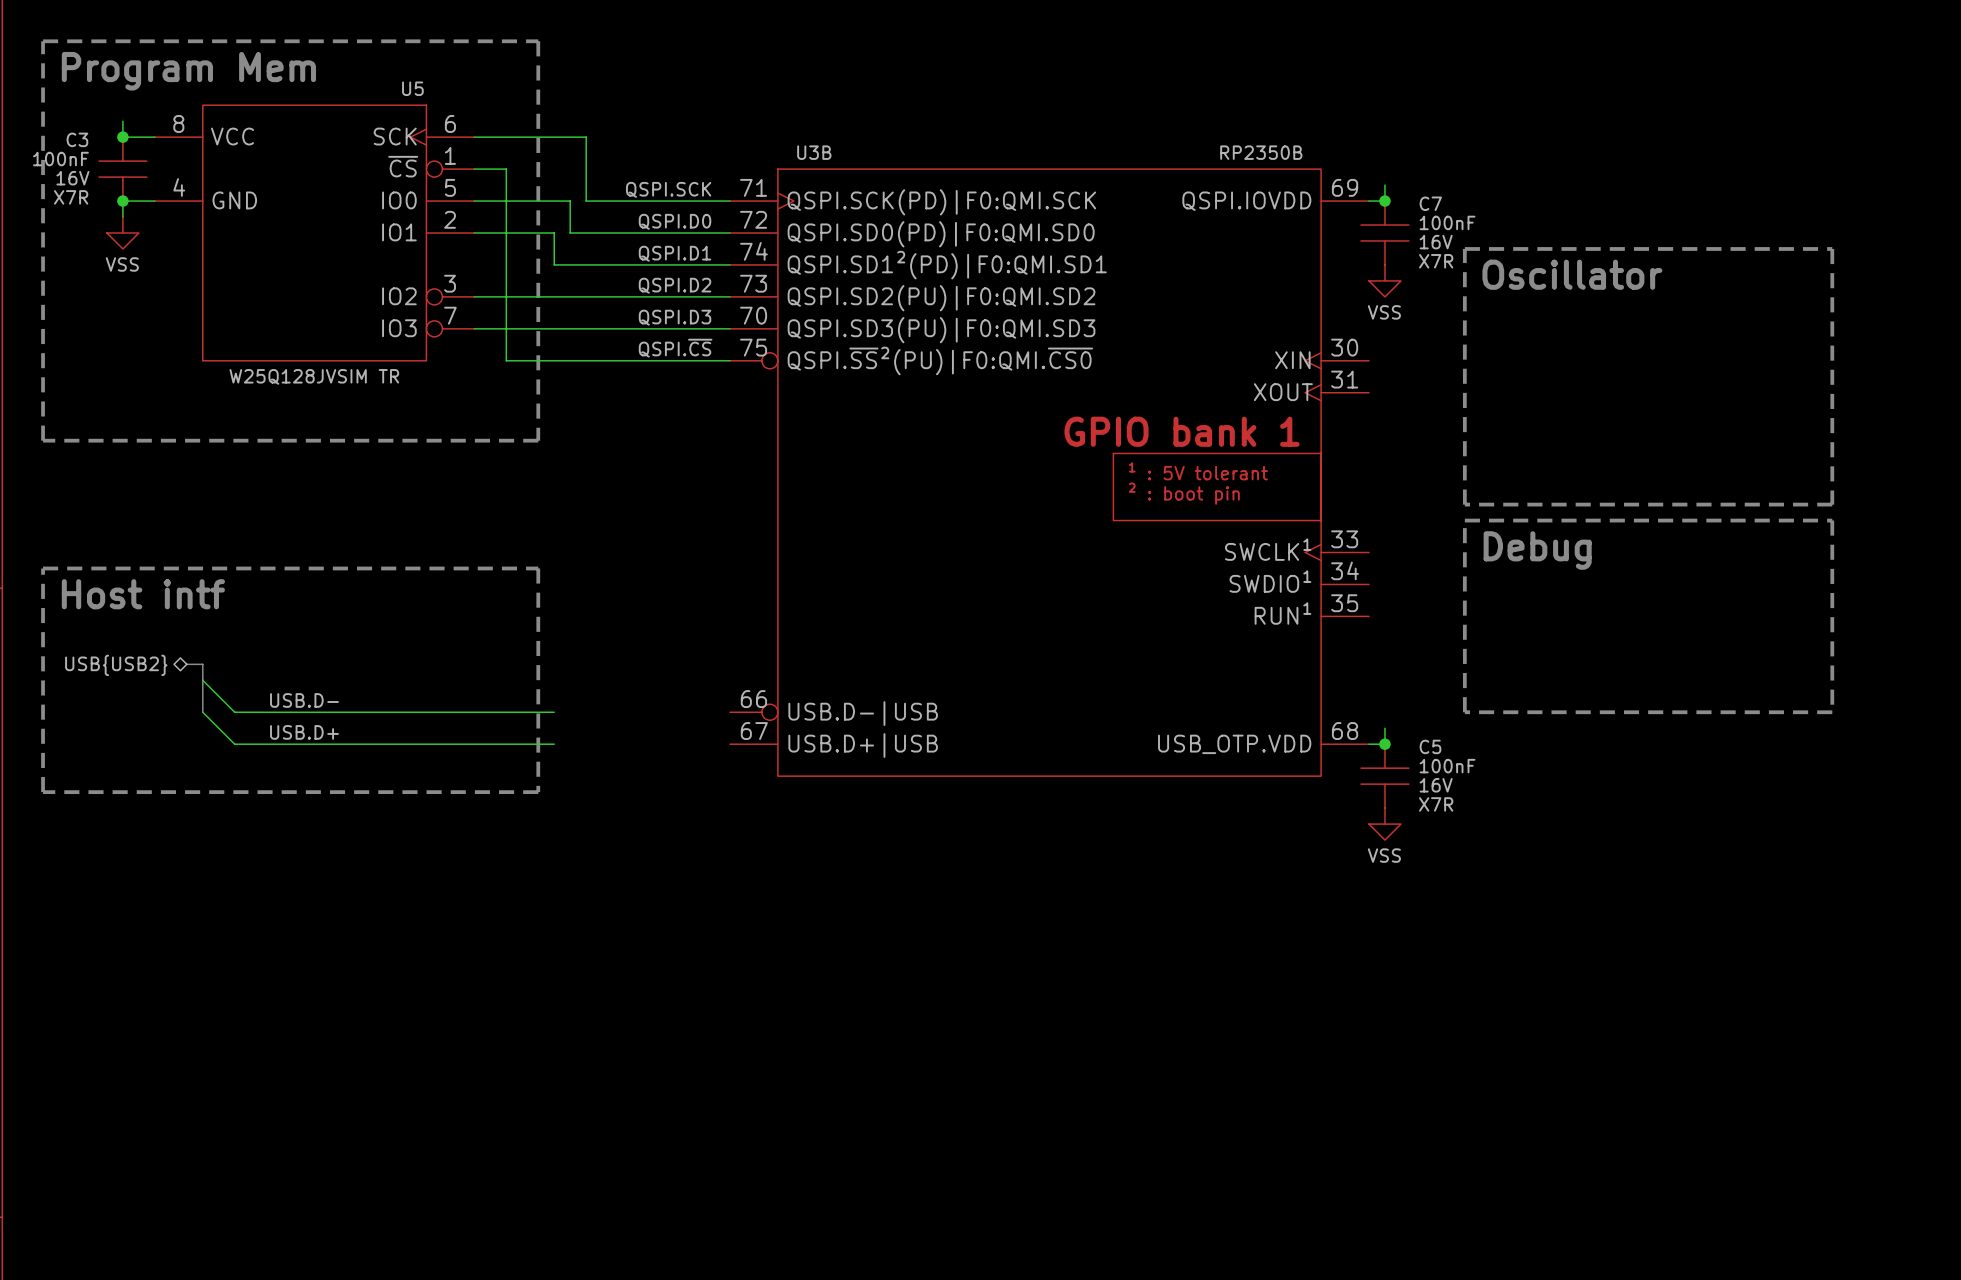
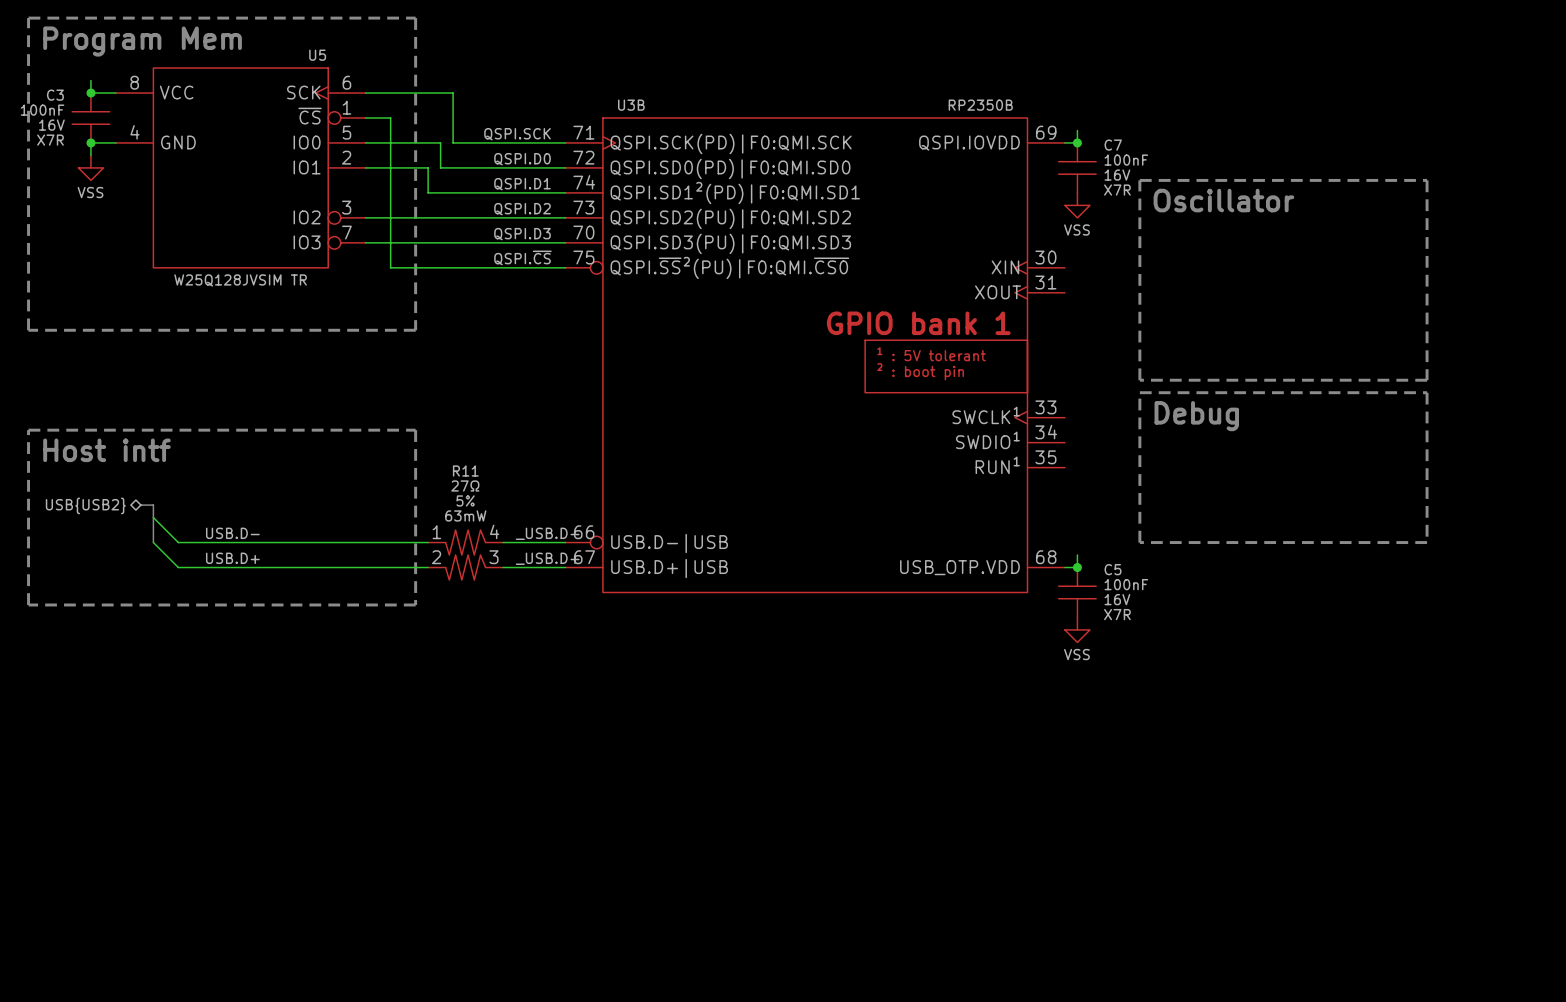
label: none -> _USB.D- (547, 533)
wire: none -> (503, 542) (565, 542)
R11: none -> (465, 555)
label: none -> _USB.D+ (547, 558)
wire: none -> (503, 567) (565, 567)

